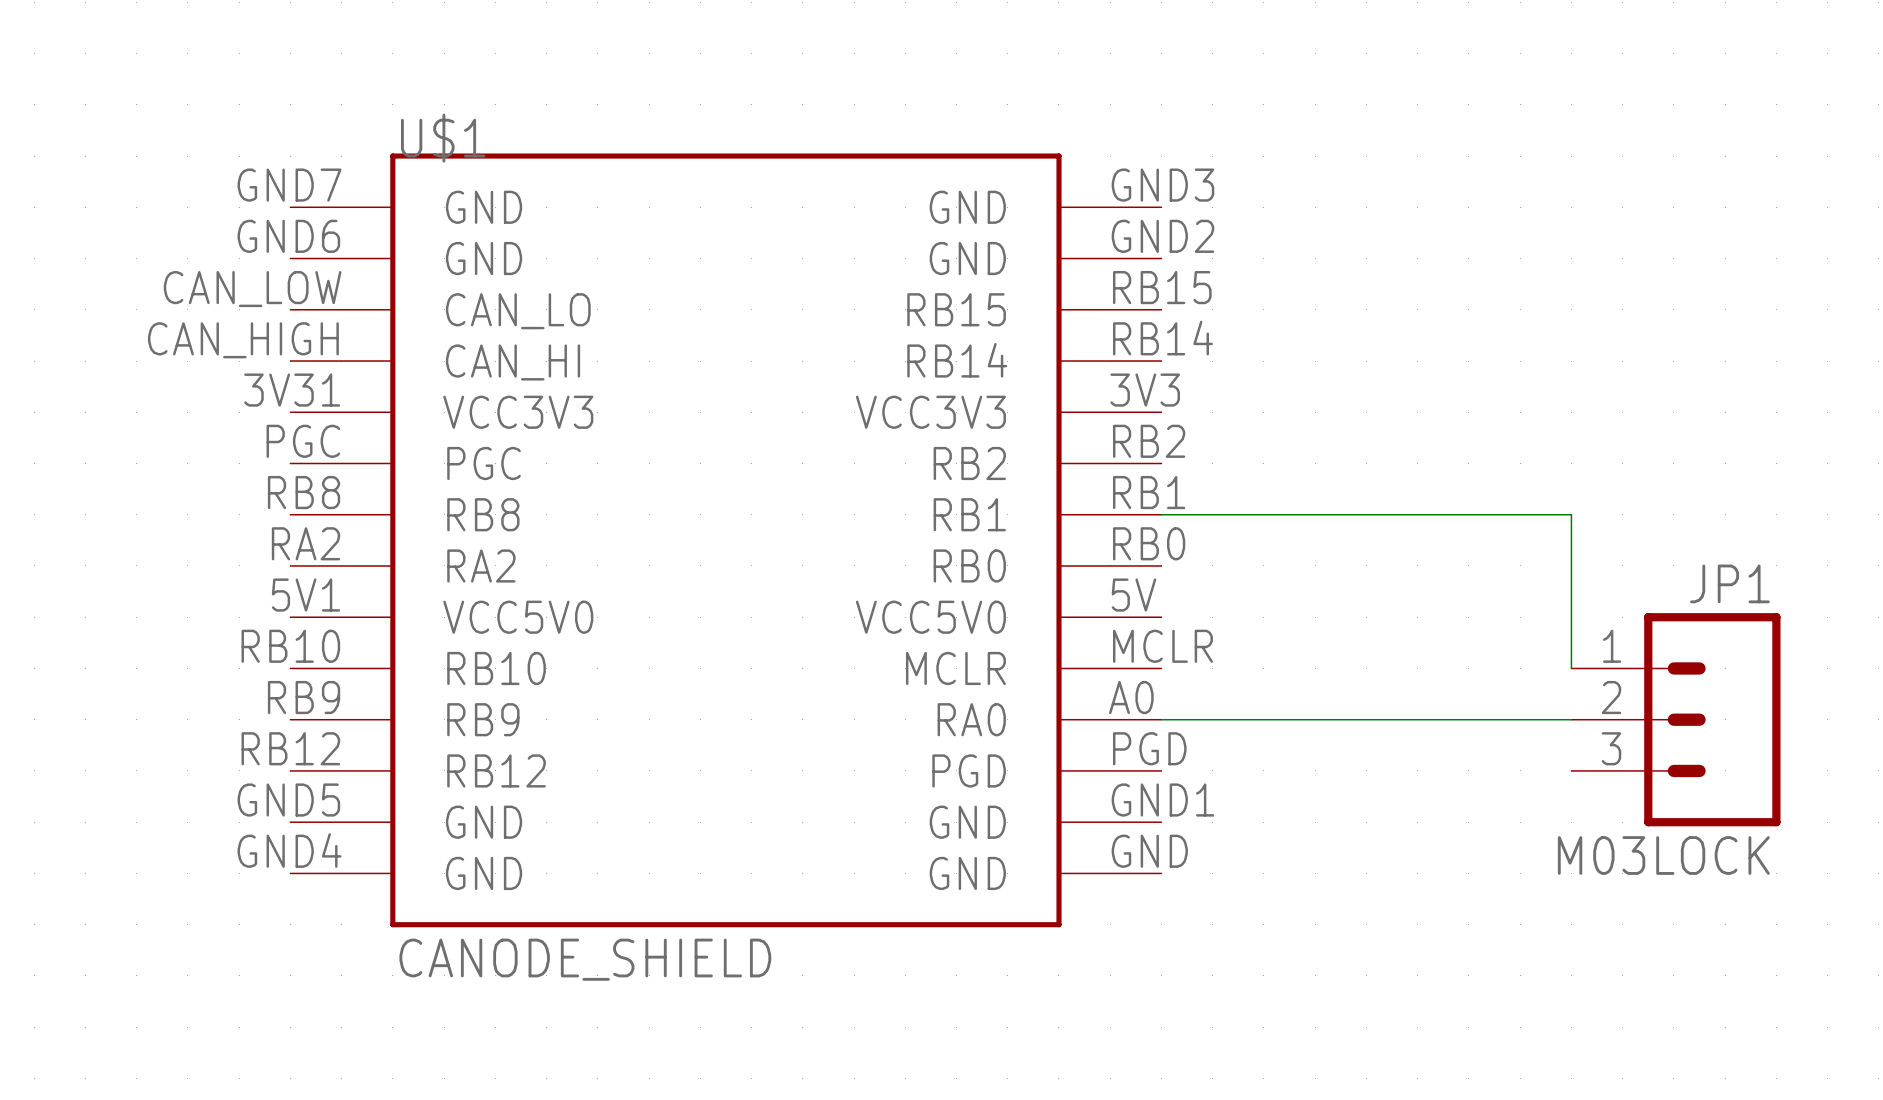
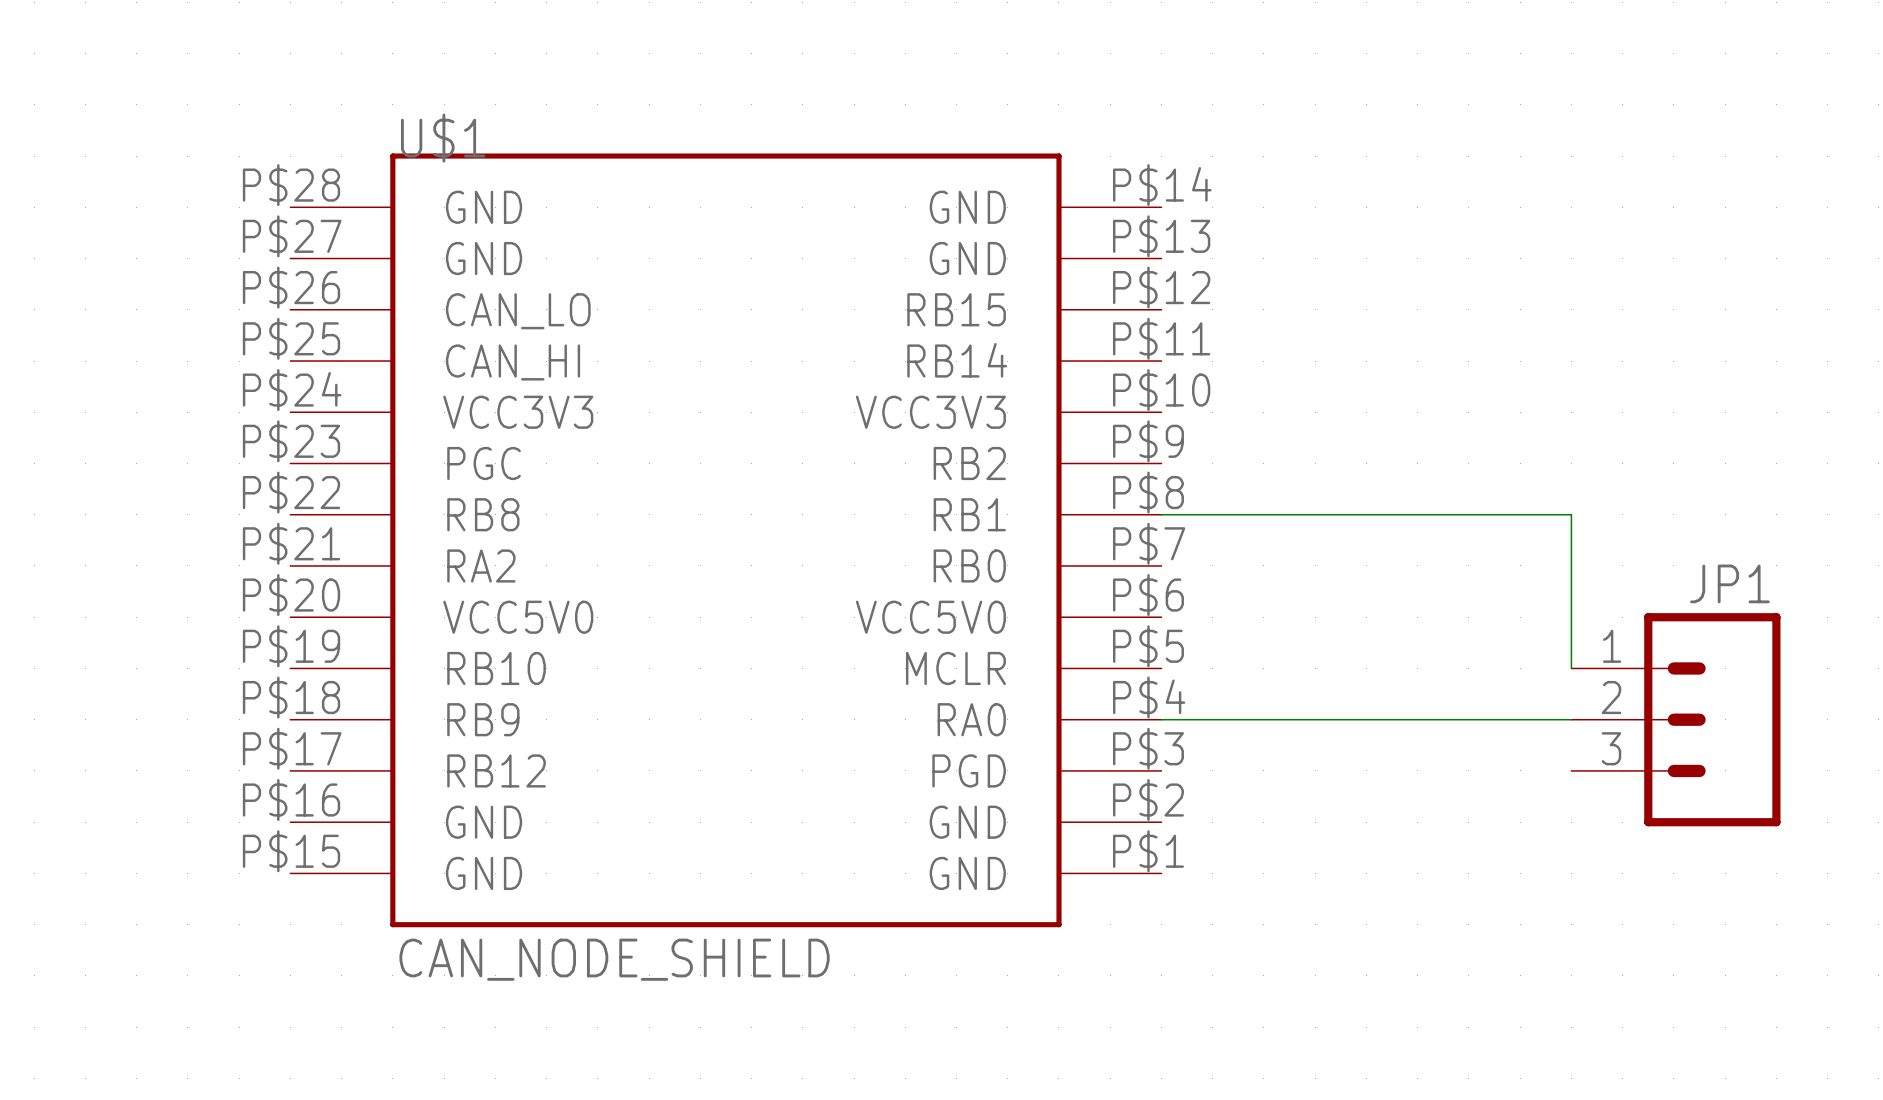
U$1 symbol: [290, 153, 1162, 928] -> [290, 153, 1162, 928]
JP1 value: M03LOCK (1663, 855) -> none
U$1 value: CANODE_SHIELD (585, 959) -> CAN_NODE_SHIELD (614, 959)

